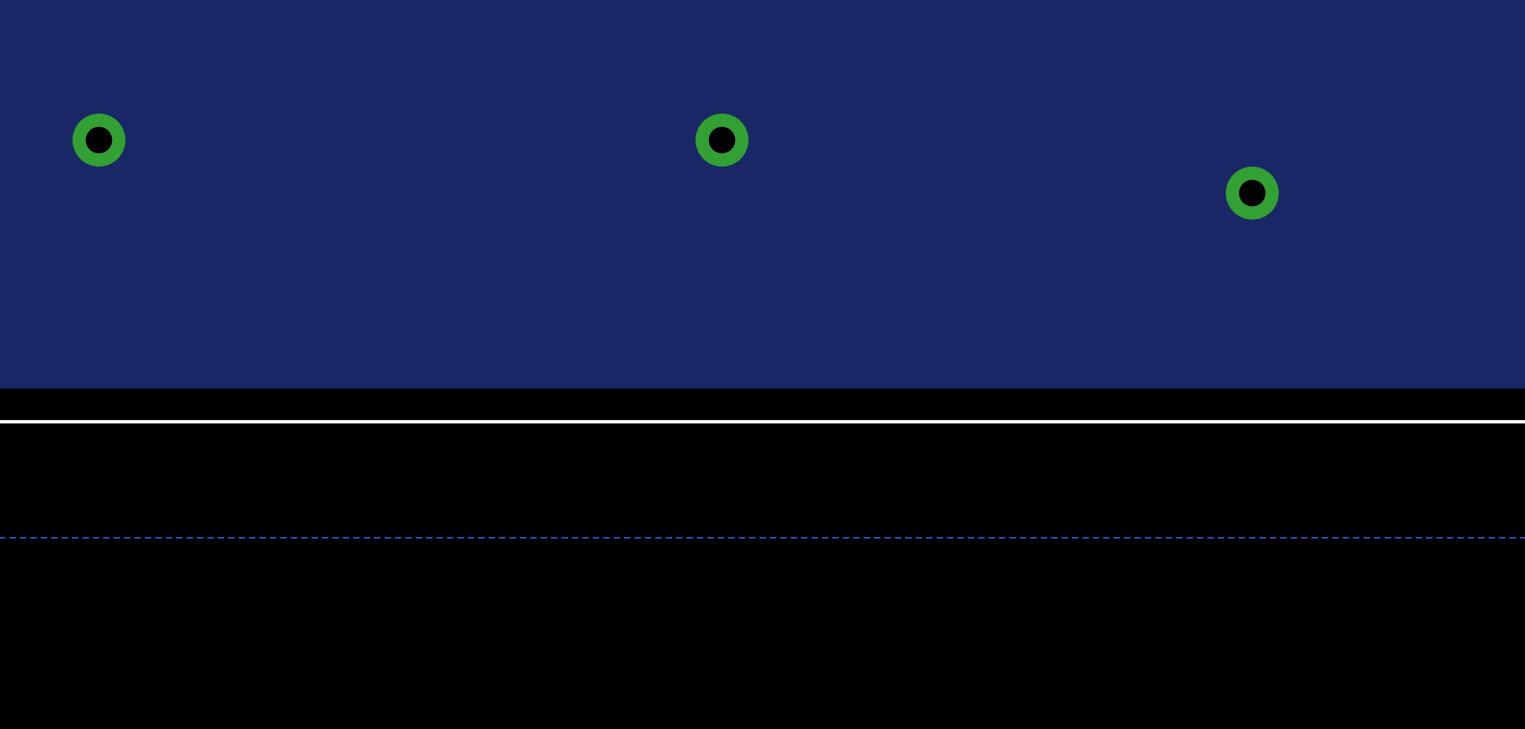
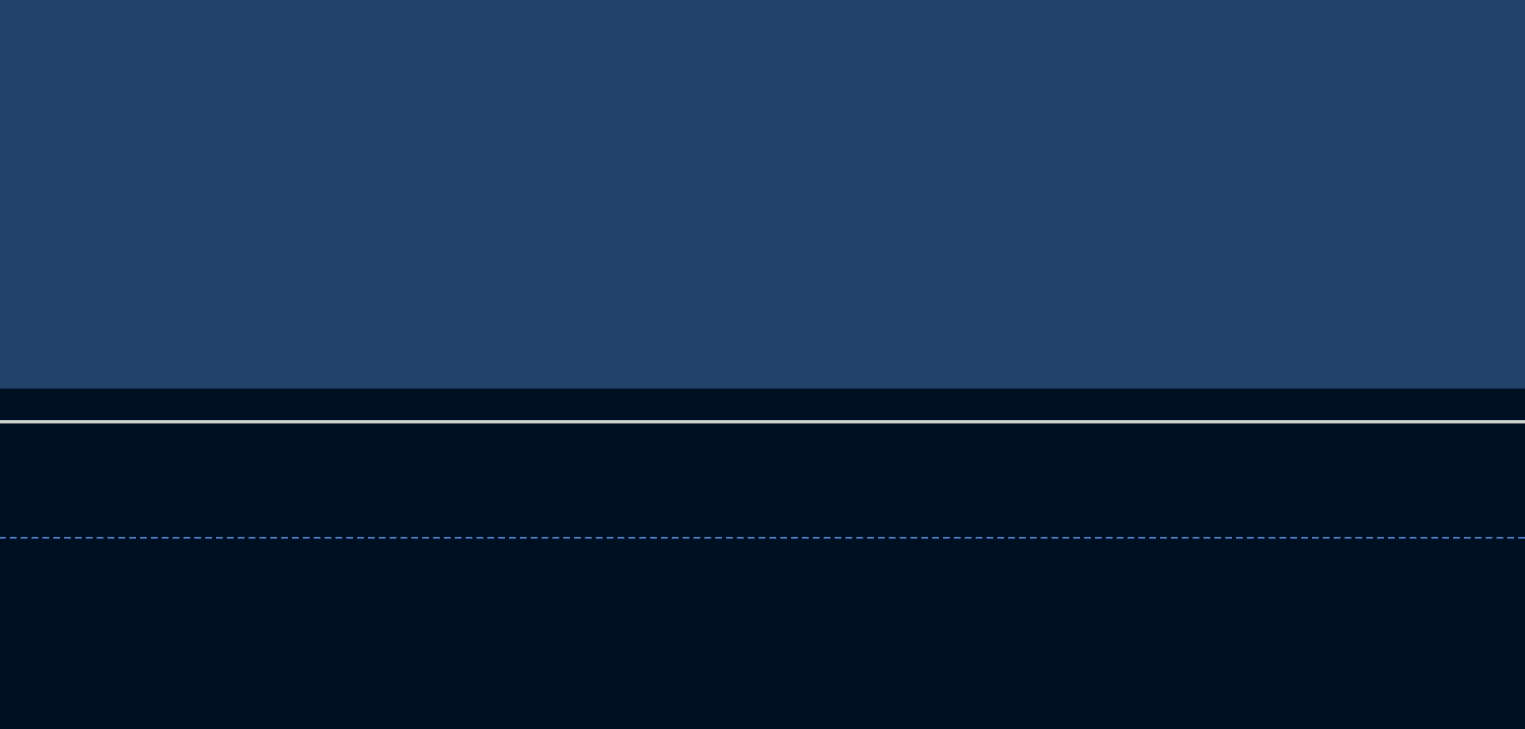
via: (98, 140) -> none
via: (722, 140) -> none
via: (1252, 193) -> none

